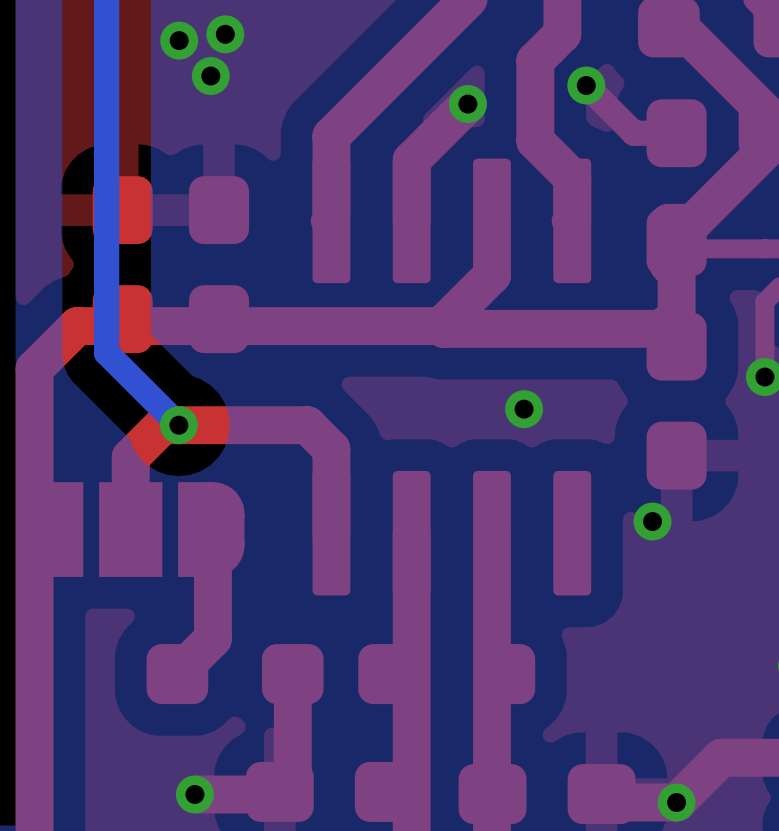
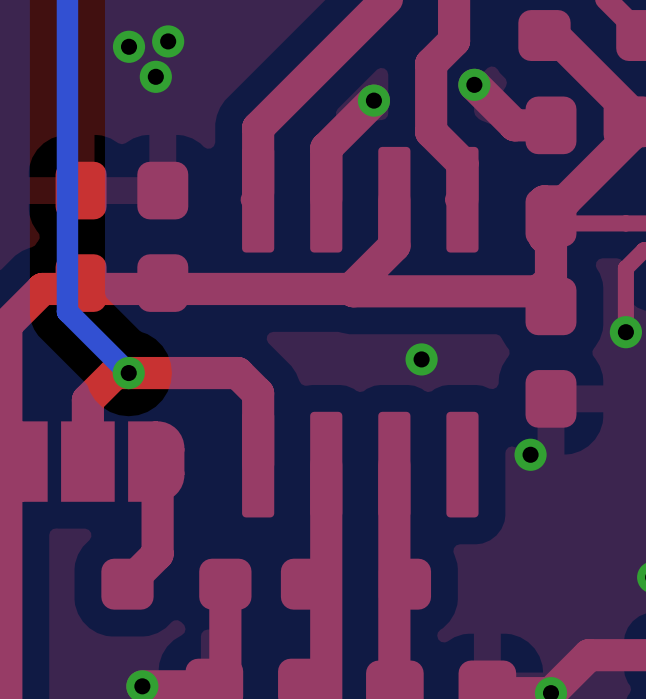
top track width: thin (586, 85) (634, 133) (667, 133) -> thick (474, 84) (514, 125) (543, 125)

